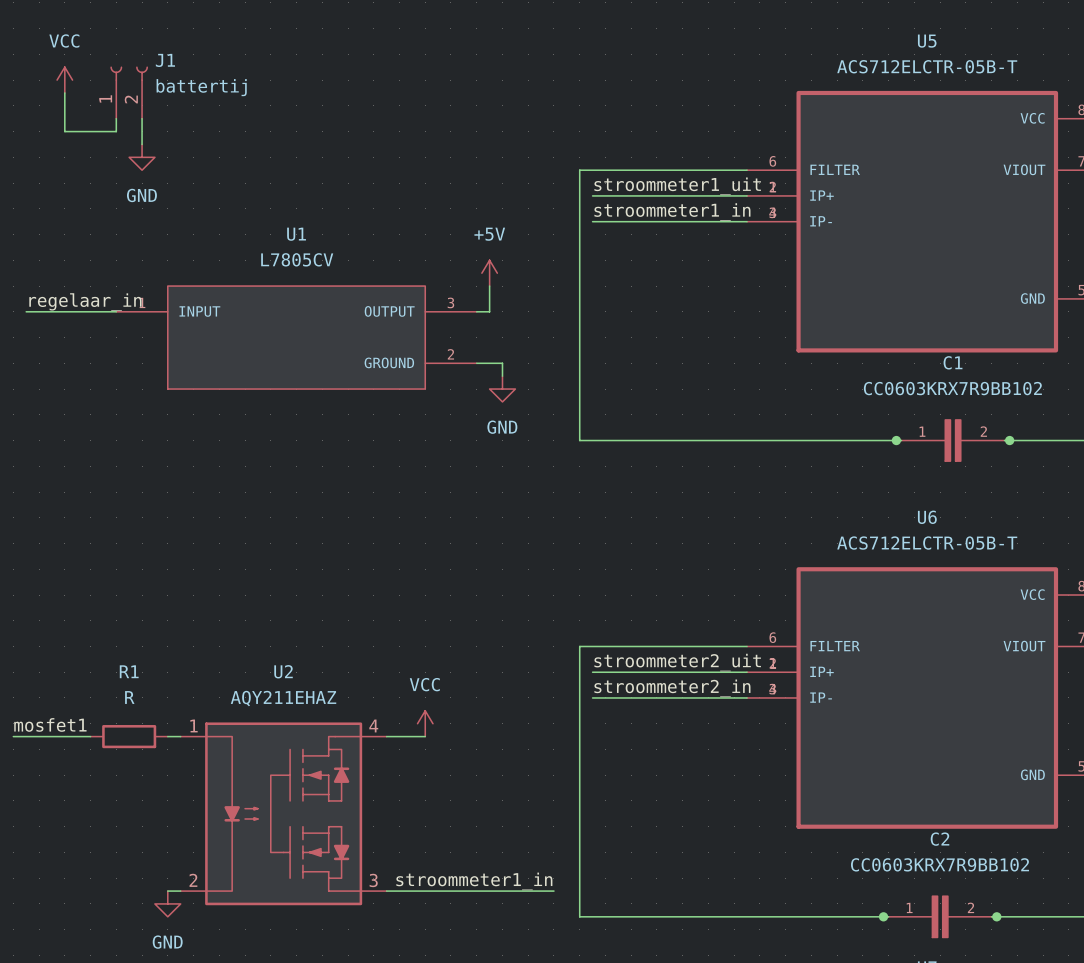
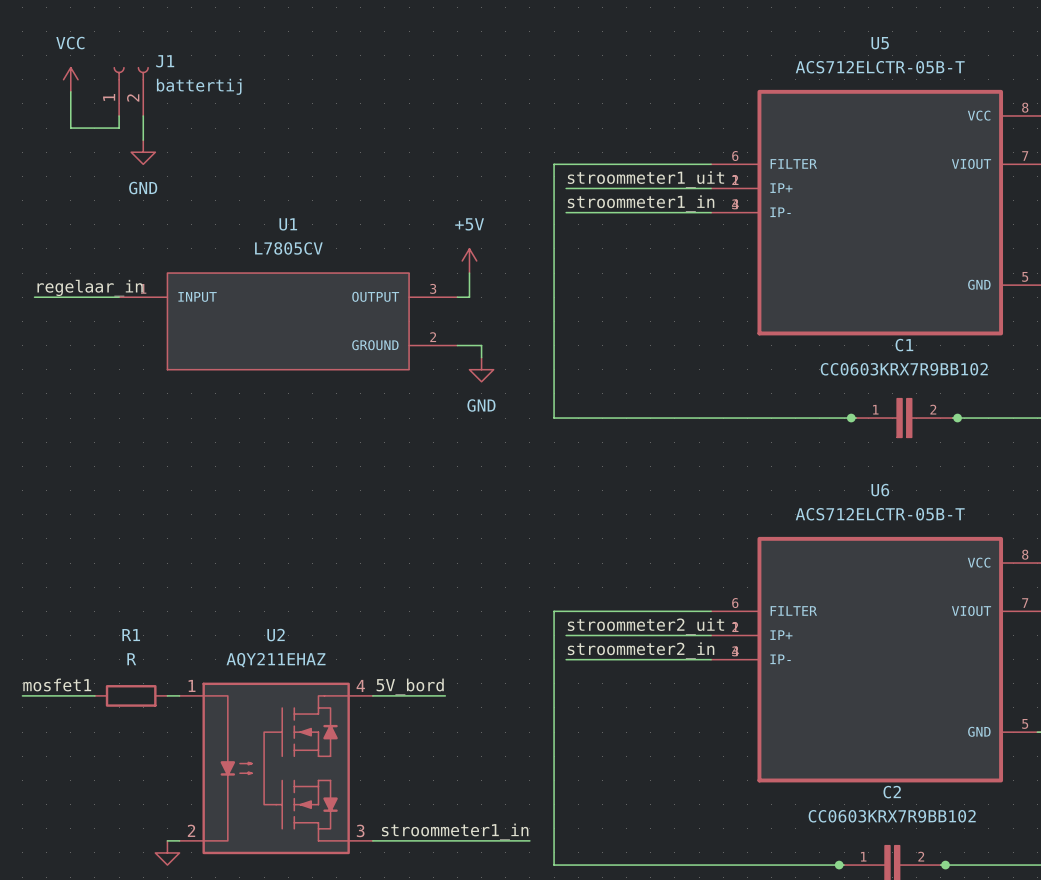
power symbol: VCC (425, 723) -> none
label: none -> 5V_bord (410, 686)
wire: none -> (409, 695) (445, 695)

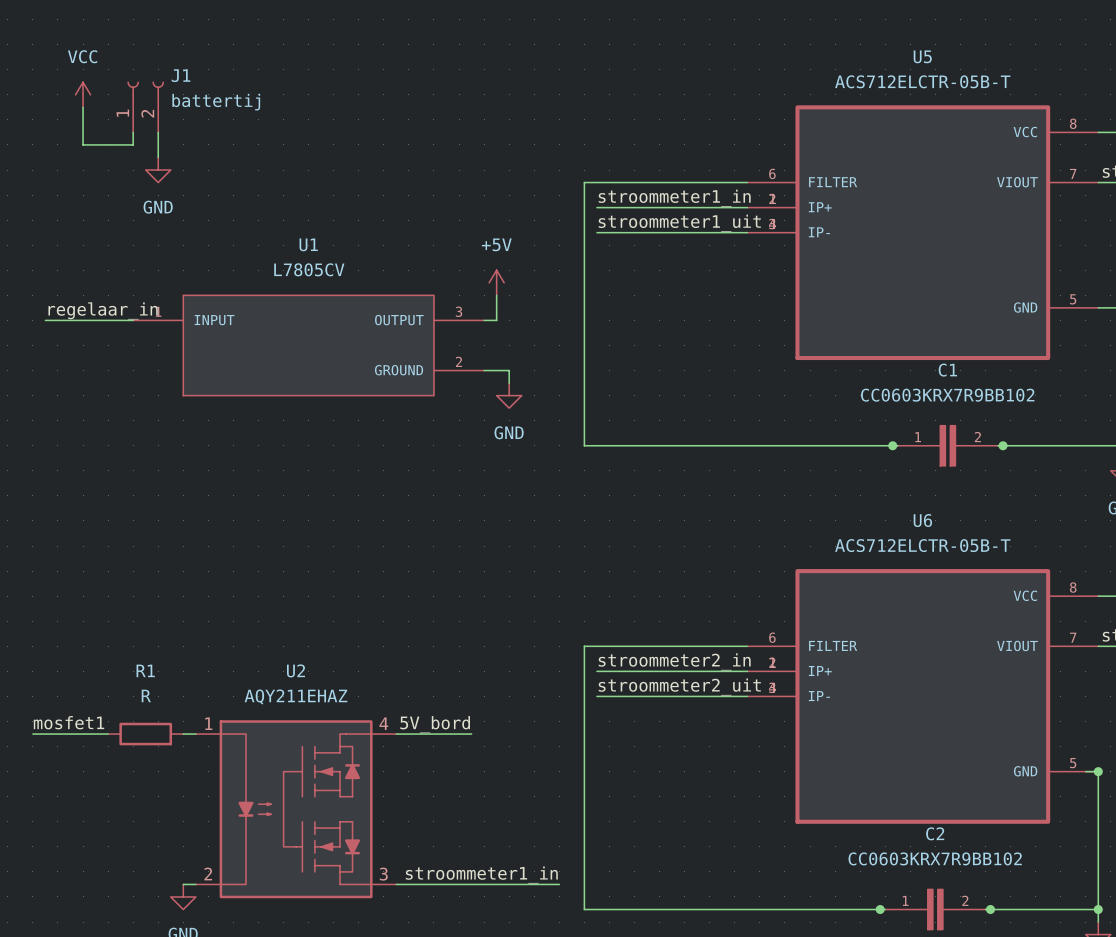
label: stroommeter1_uit (646, 179) -> stroommeter1_in (674, 198)
label: stroommeter1_in (641, 203) -> stroommeter1_uit (679, 223)
label: stroommeter2_uit (646, 626) -> stroommeter2_in (674, 661)
label: stroommeter2_in (641, 650) -> stroommeter2_uit (679, 687)

